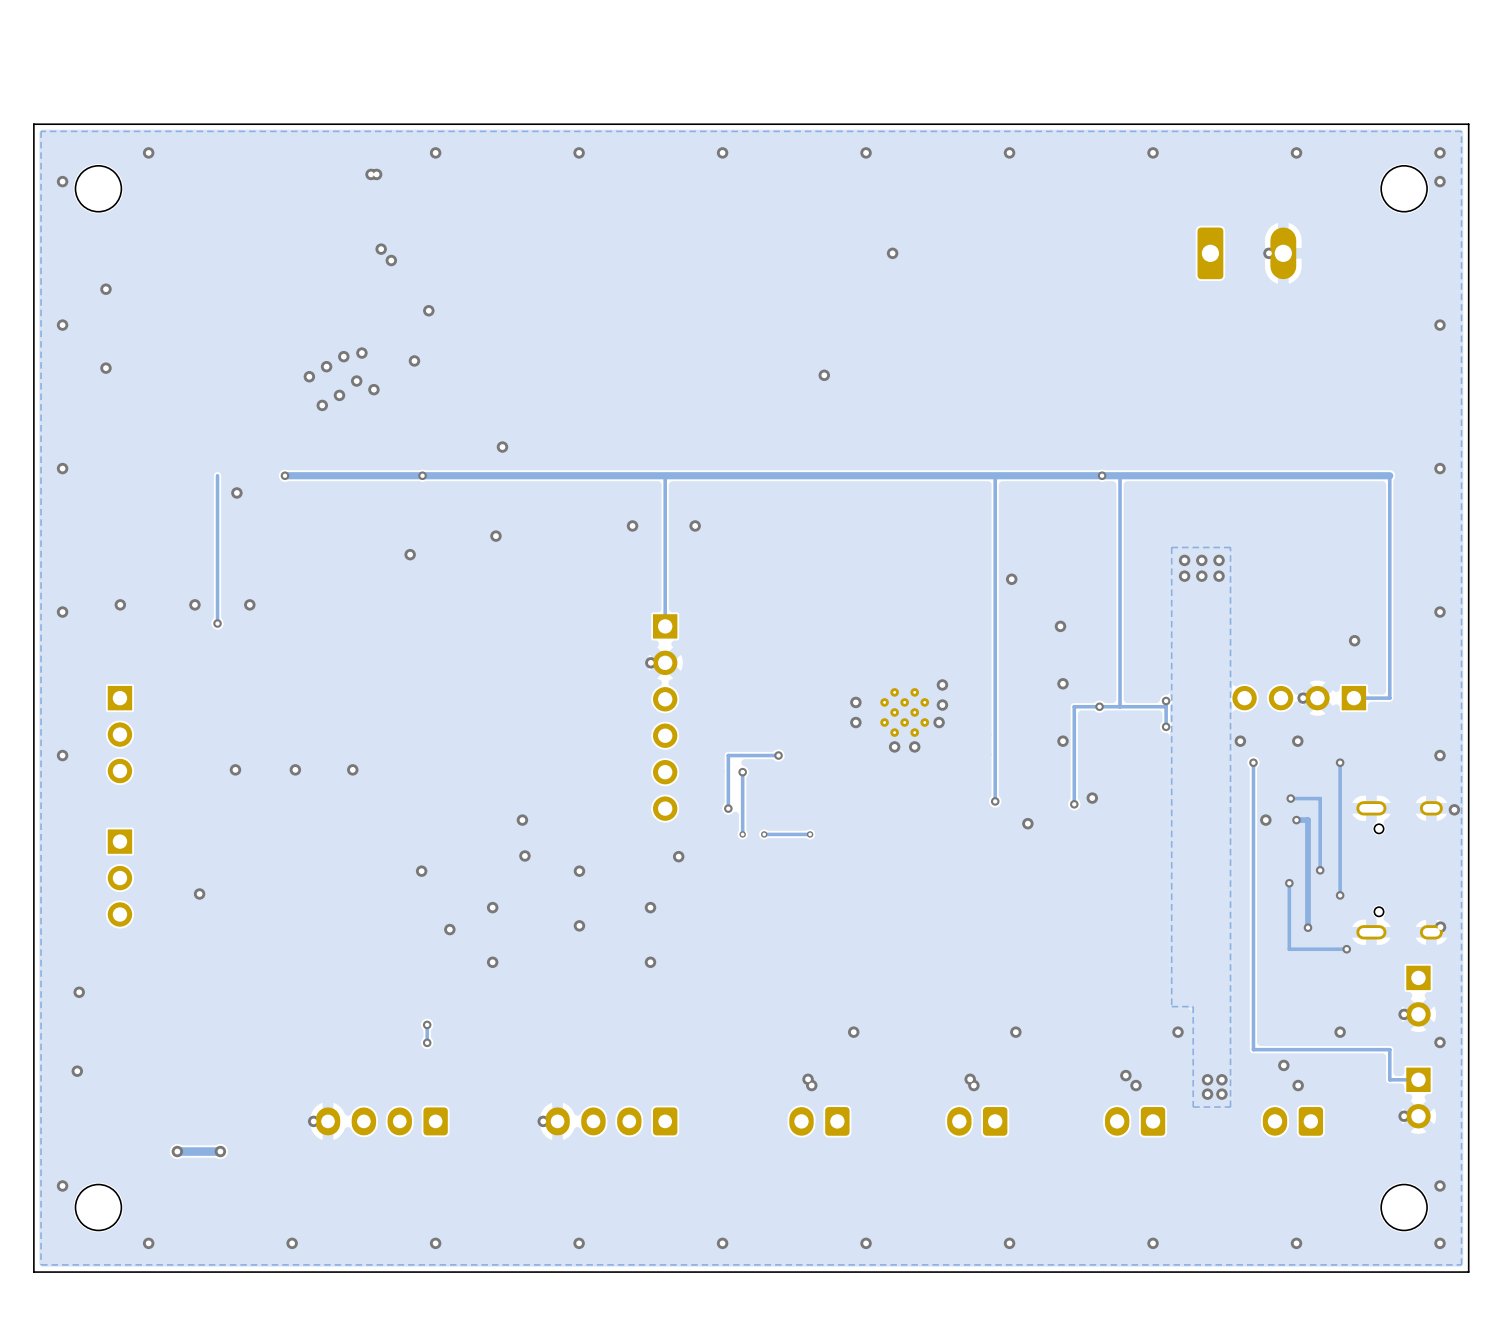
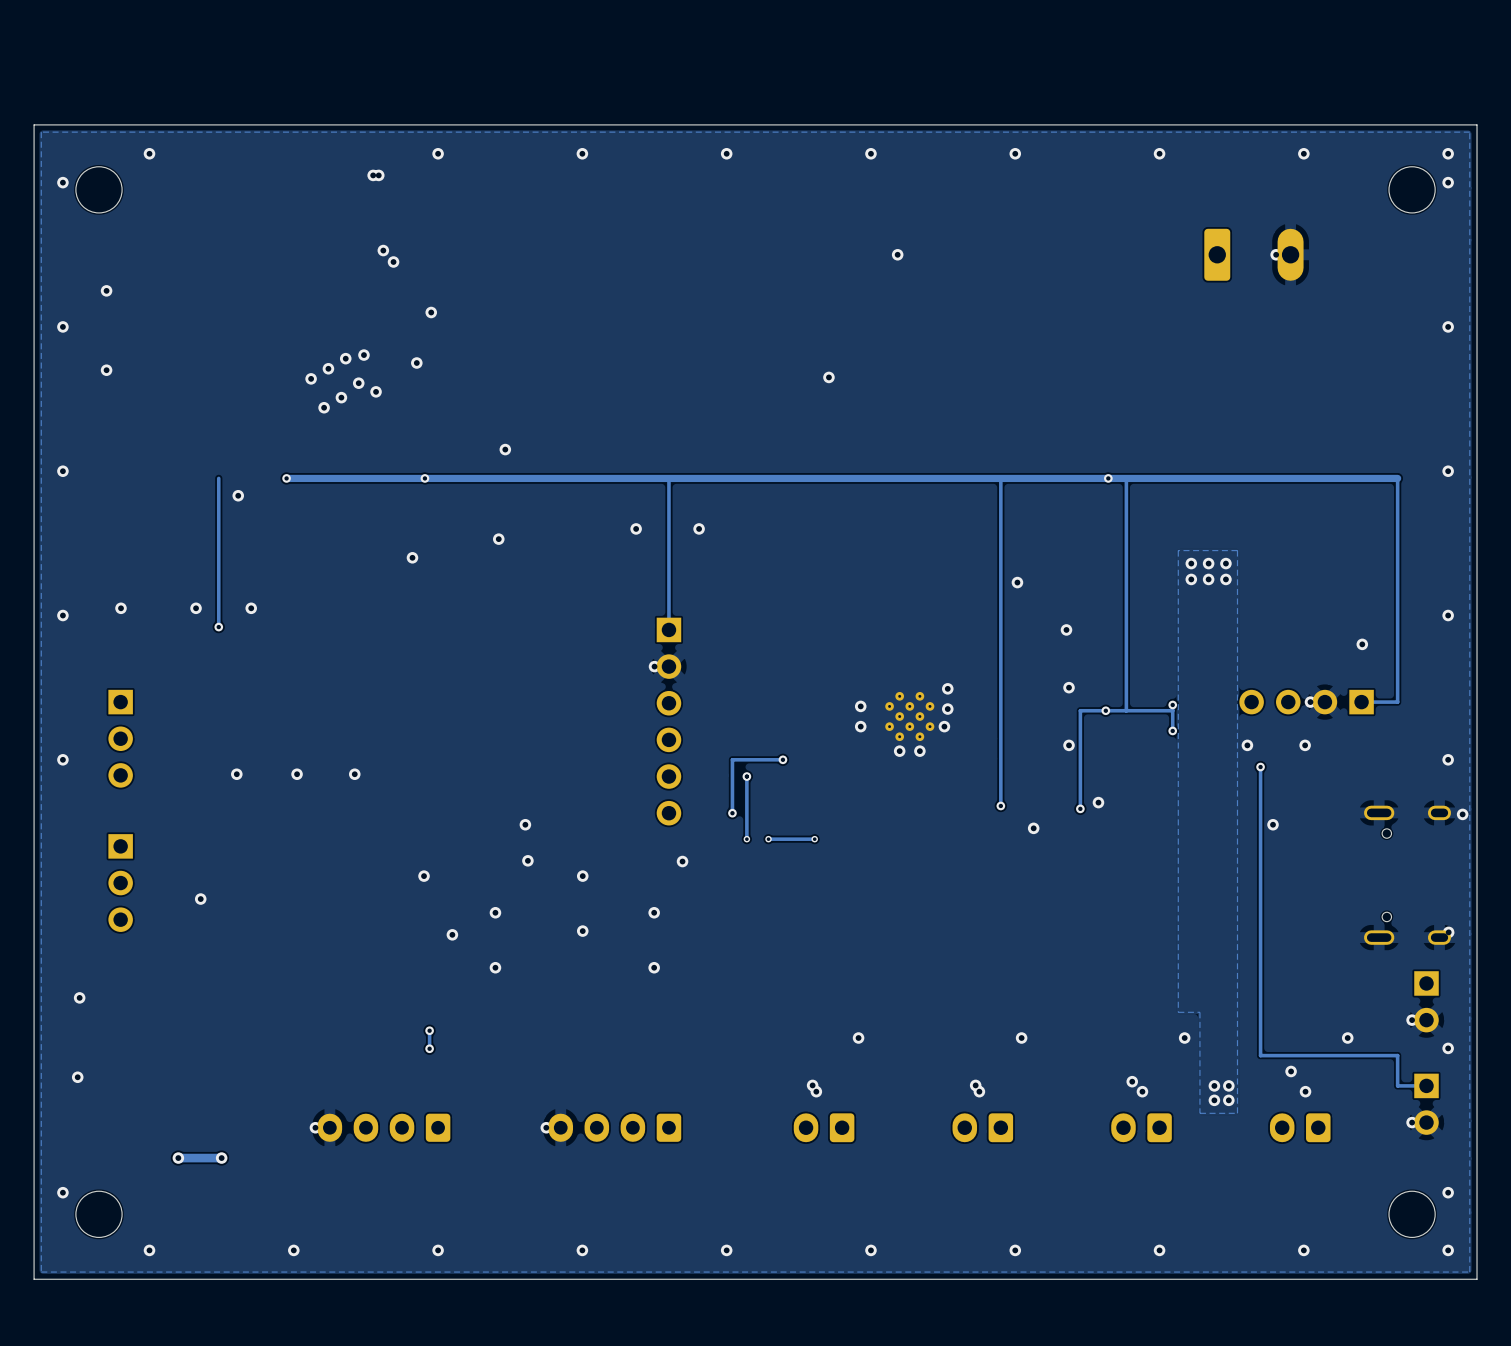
track: (1340, 762) (1340, 895) -> none
via: (1340, 762) -> none
track: (1290, 798) (1320, 798) (1320, 870) -> none
via: (1290, 798) -> none
track: (1296, 820) (1307, 820) (1307, 927) -> none
via: (1296, 820) -> none
via: (1320, 870) -> none
track: (1289, 883) (1289, 949) (1346, 949) -> none
via: (1289, 883) -> none
via: (1340, 895) -> none
via: (1307, 927) -> none
via: (1346, 949) -> none

